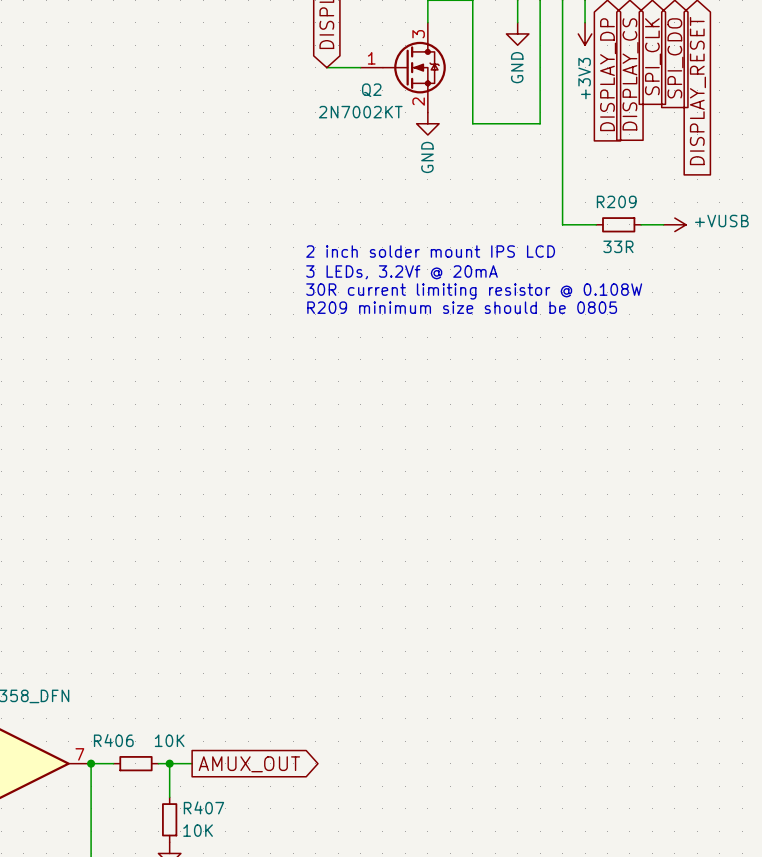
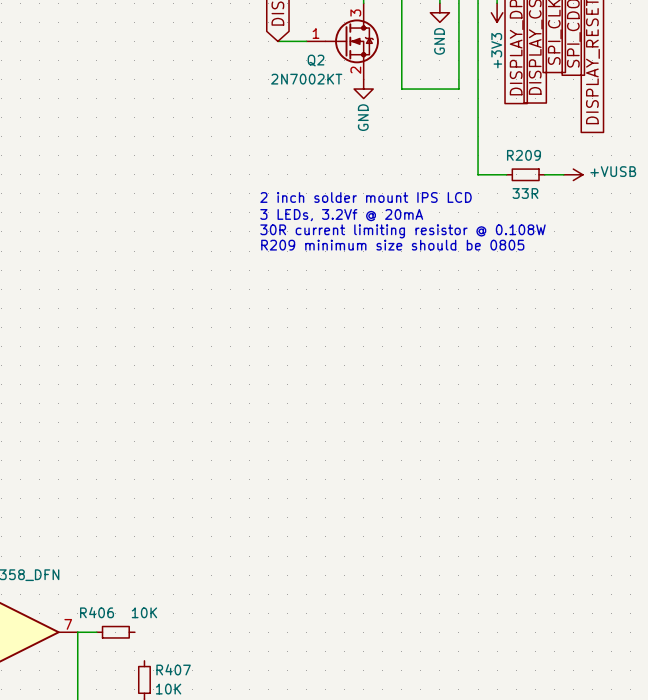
junction: (91, 763) -> none
wire: (158, 763) (192, 763) -> none
wire: (169, 763) (169, 797) -> none
junction: (169, 763) -> none
global label: AMUX_OUT (249, 764) -> none

